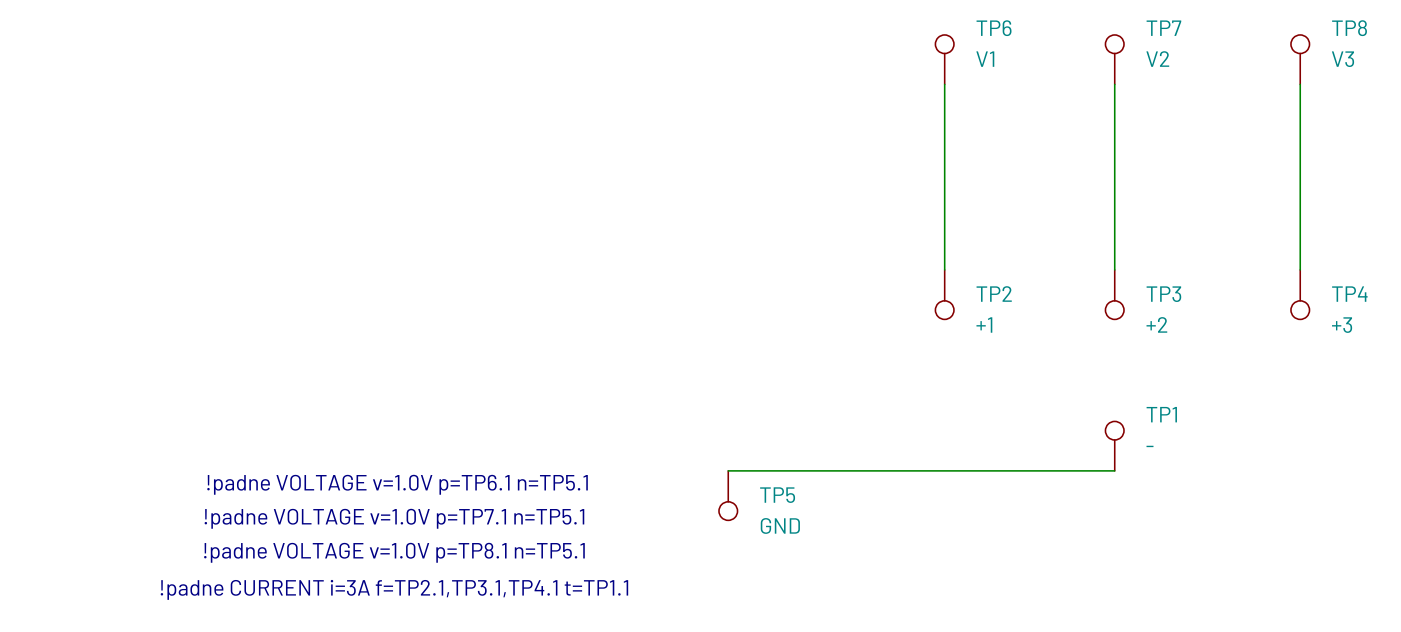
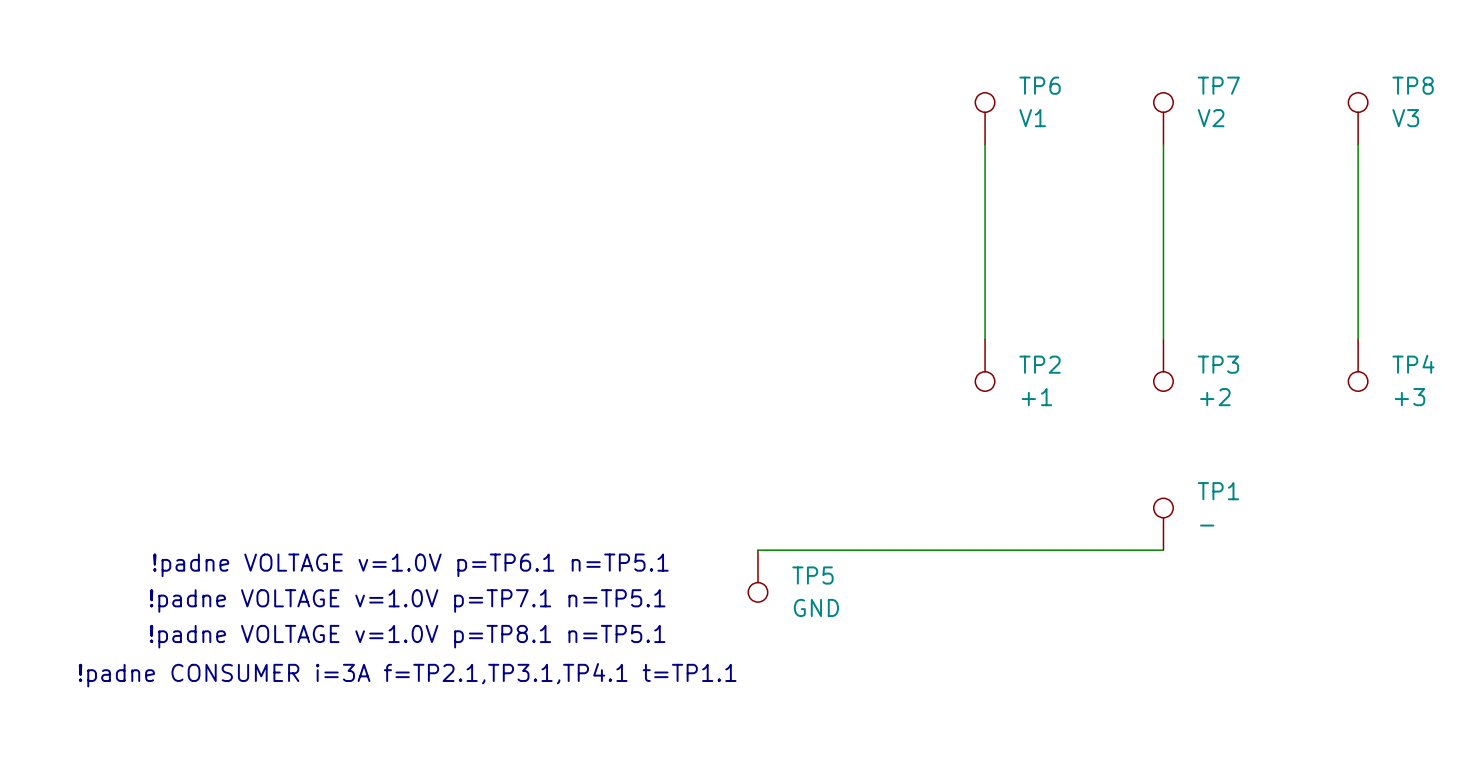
text: !padne CURRENT i=3A f=TP2.1,TP3.1,TP4.1 t=TP1.1 (394, 589) -> !padne CONSUMER i=3A f=TP2.1,TP3.1,TP4.1 t=TP1.1 (407, 675)

